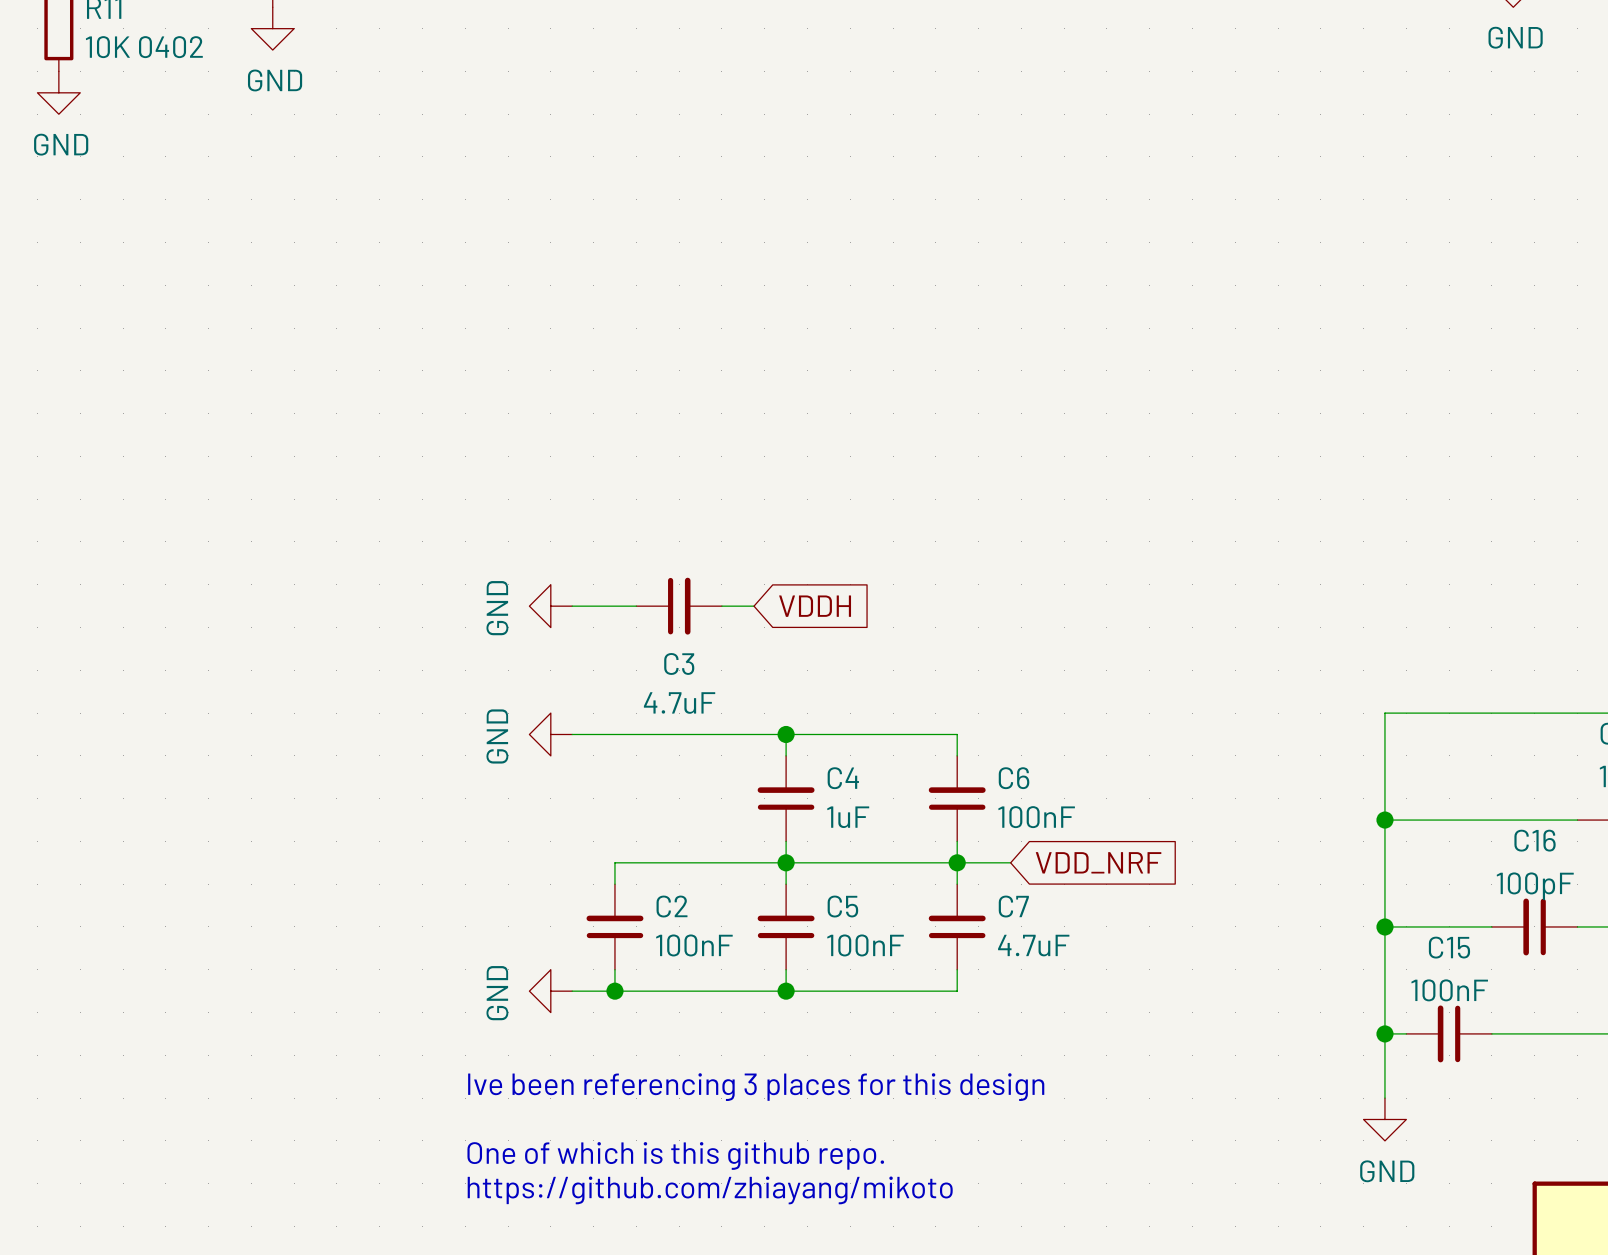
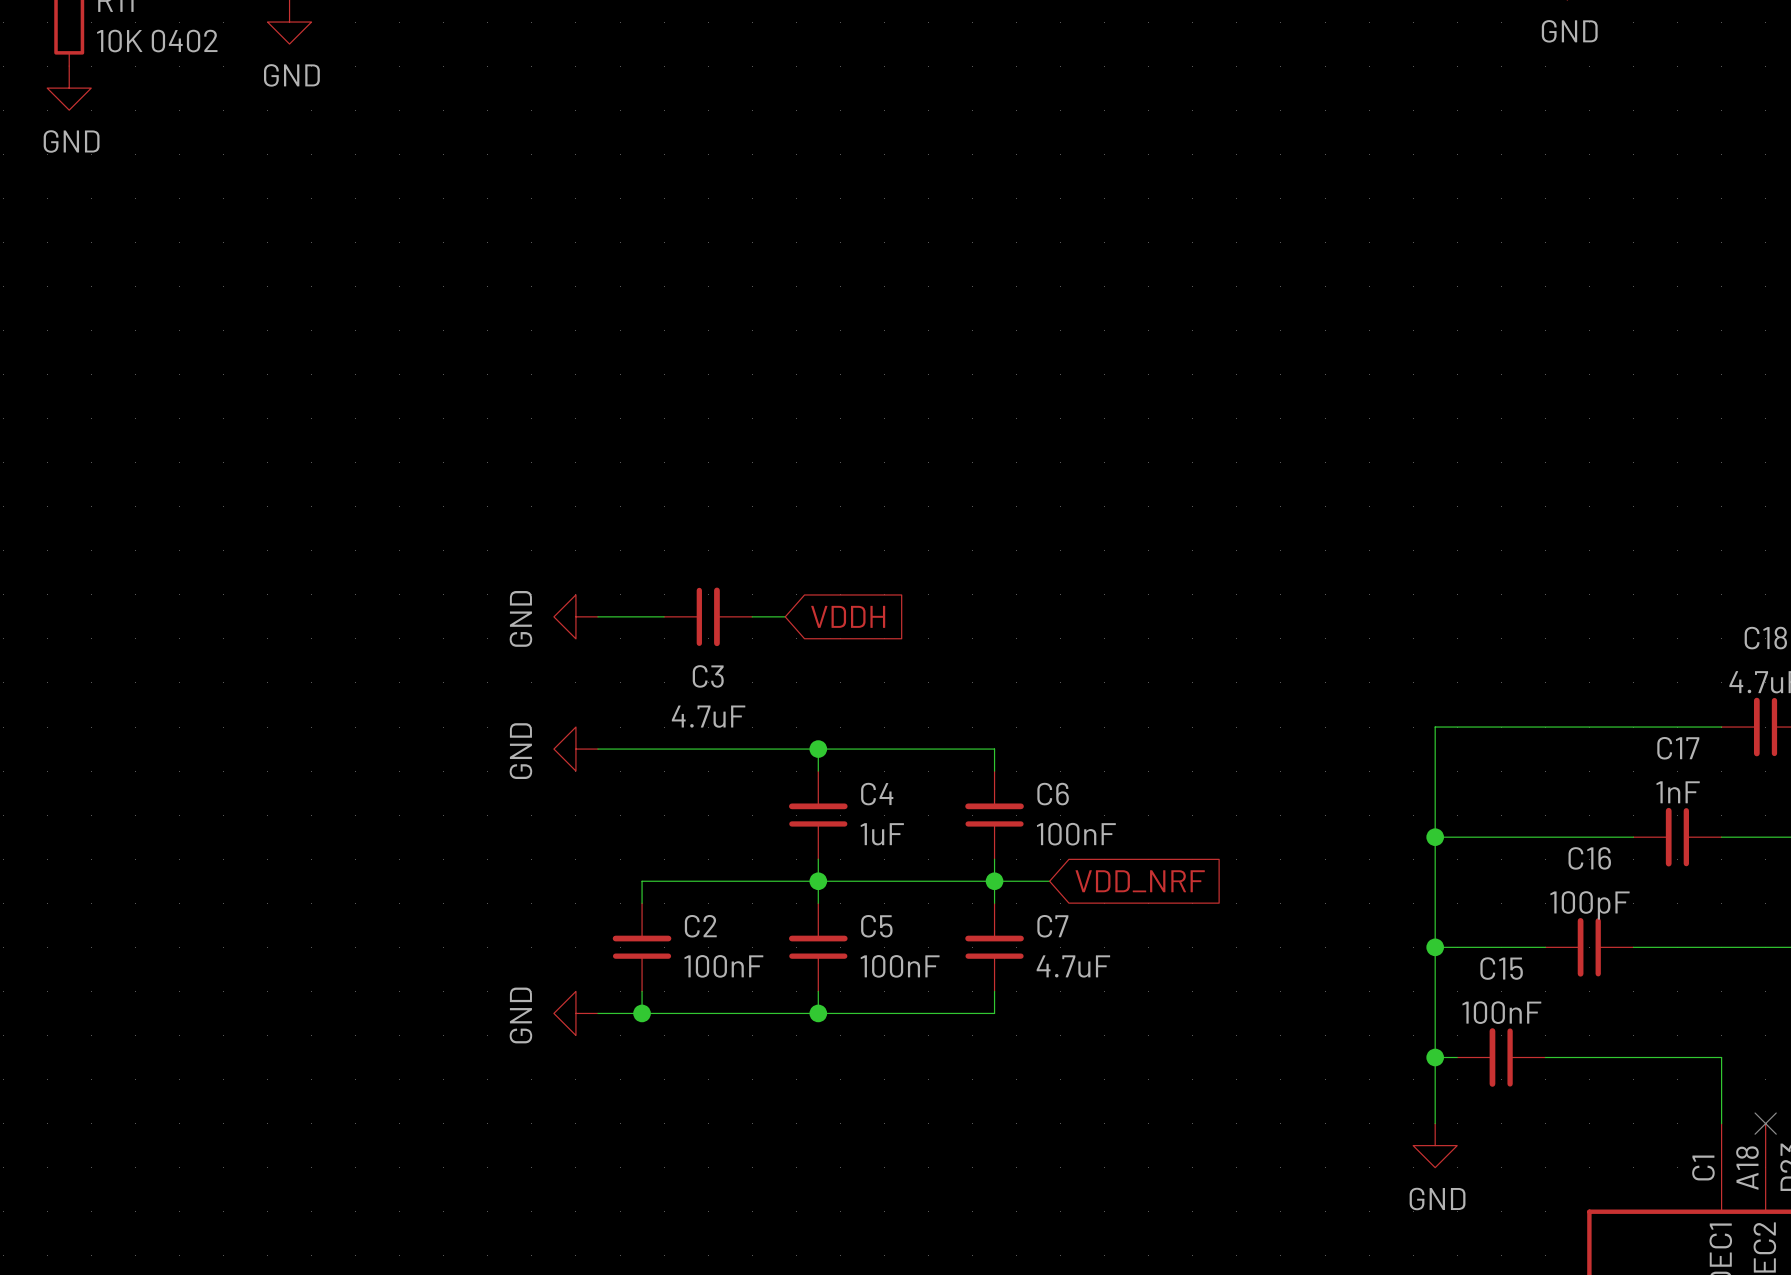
text: Ive been referencing 3 places for this design (756, 1087) -> none
text: One of which is this github repo. (675, 1155) -> none
text: https://github.com/zhiayang/mikoto (710, 1190) -> none

